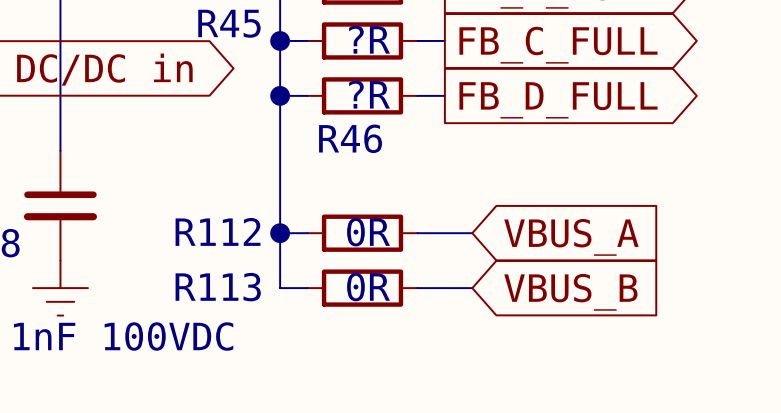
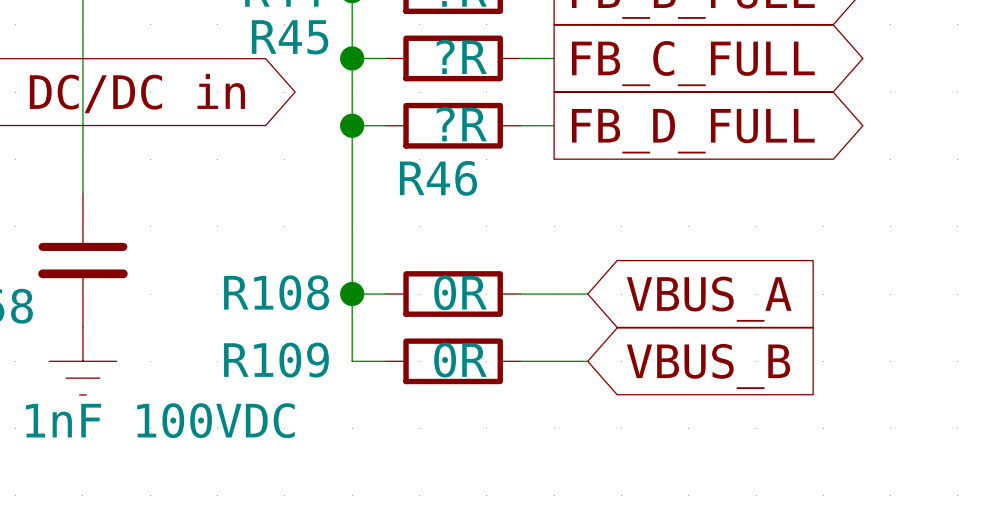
R112 name: R112 (218, 231) -> R108 (276, 292)
R113 name: R113 (218, 287) -> R109 (276, 360)

